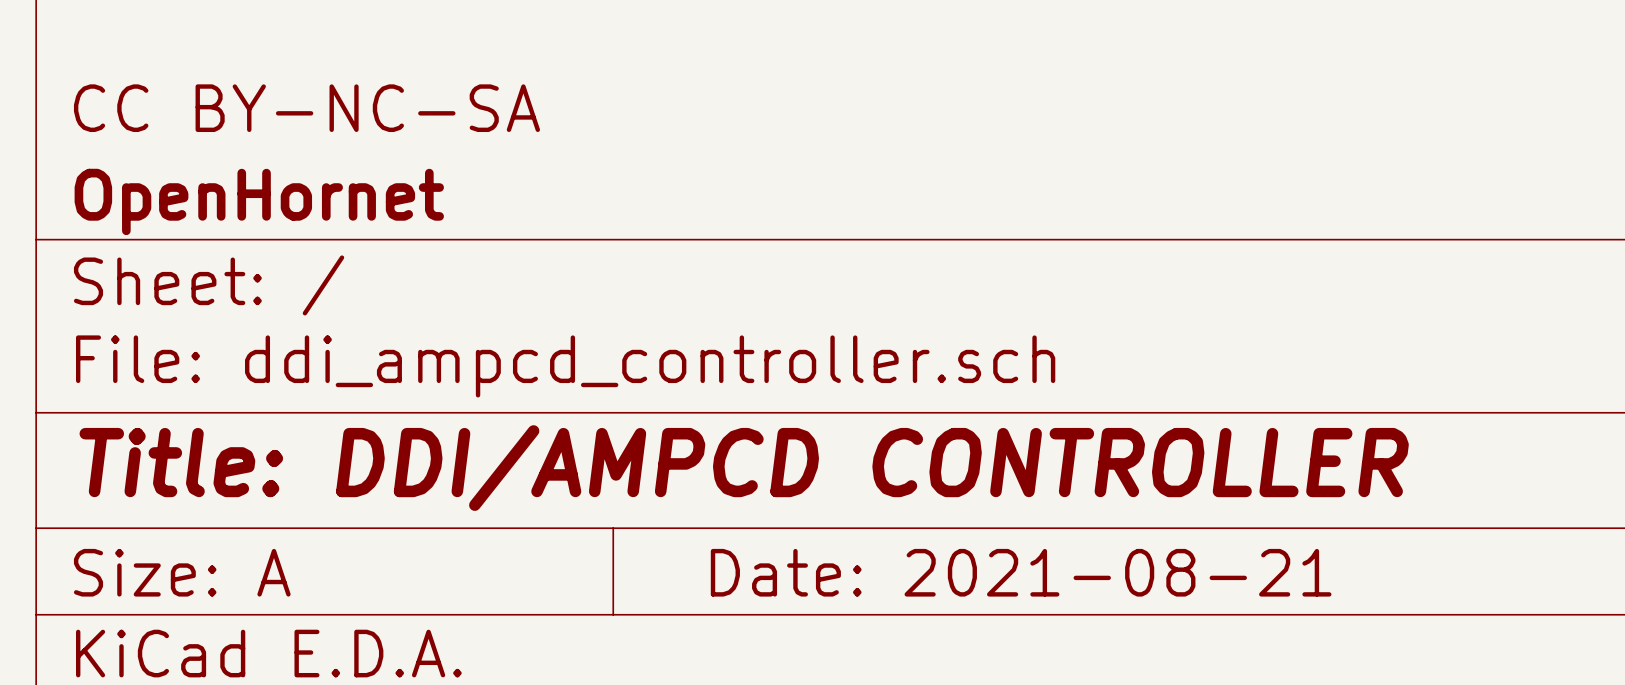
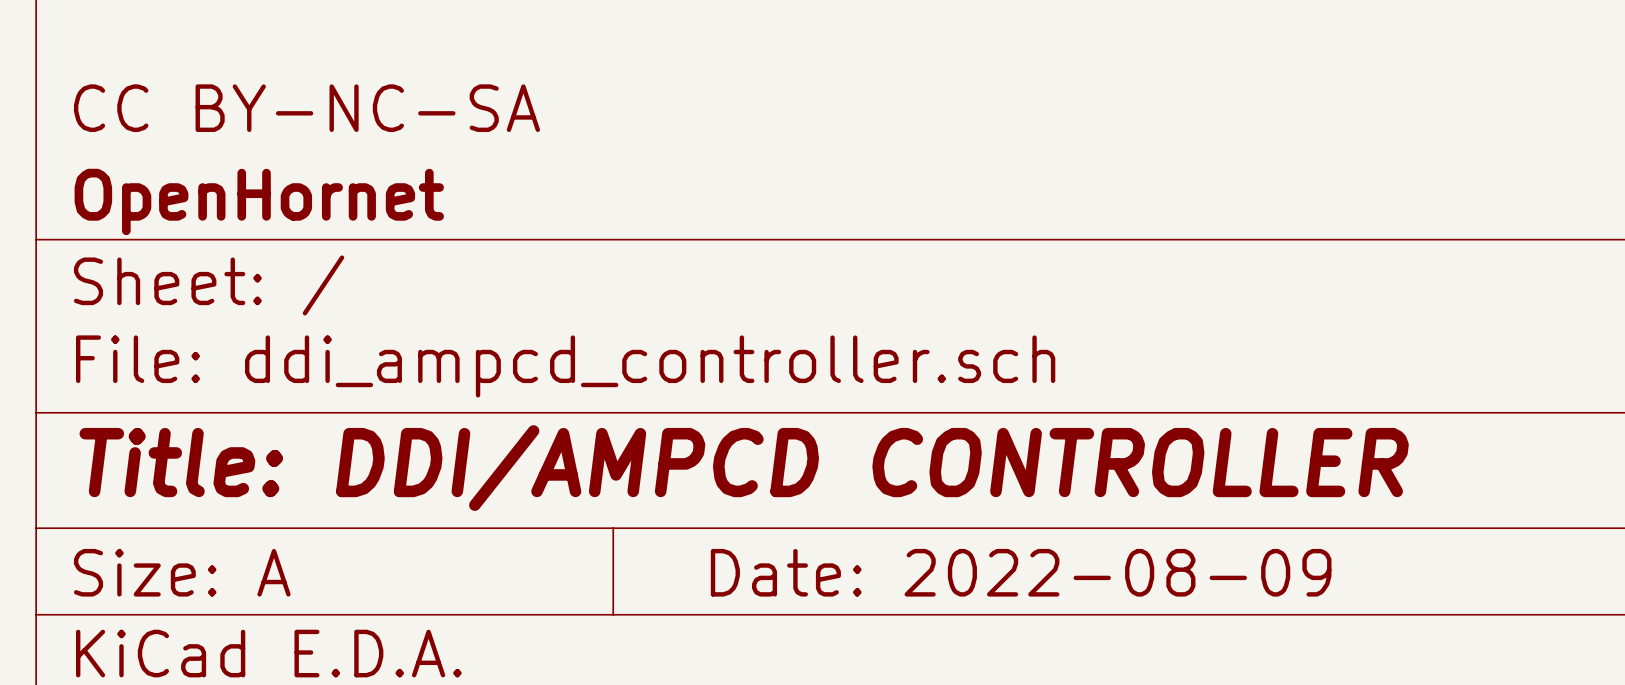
title block: Date: 2021-08-21 (1021, 572) -> Date: 2022-08-09 (1021, 572)

